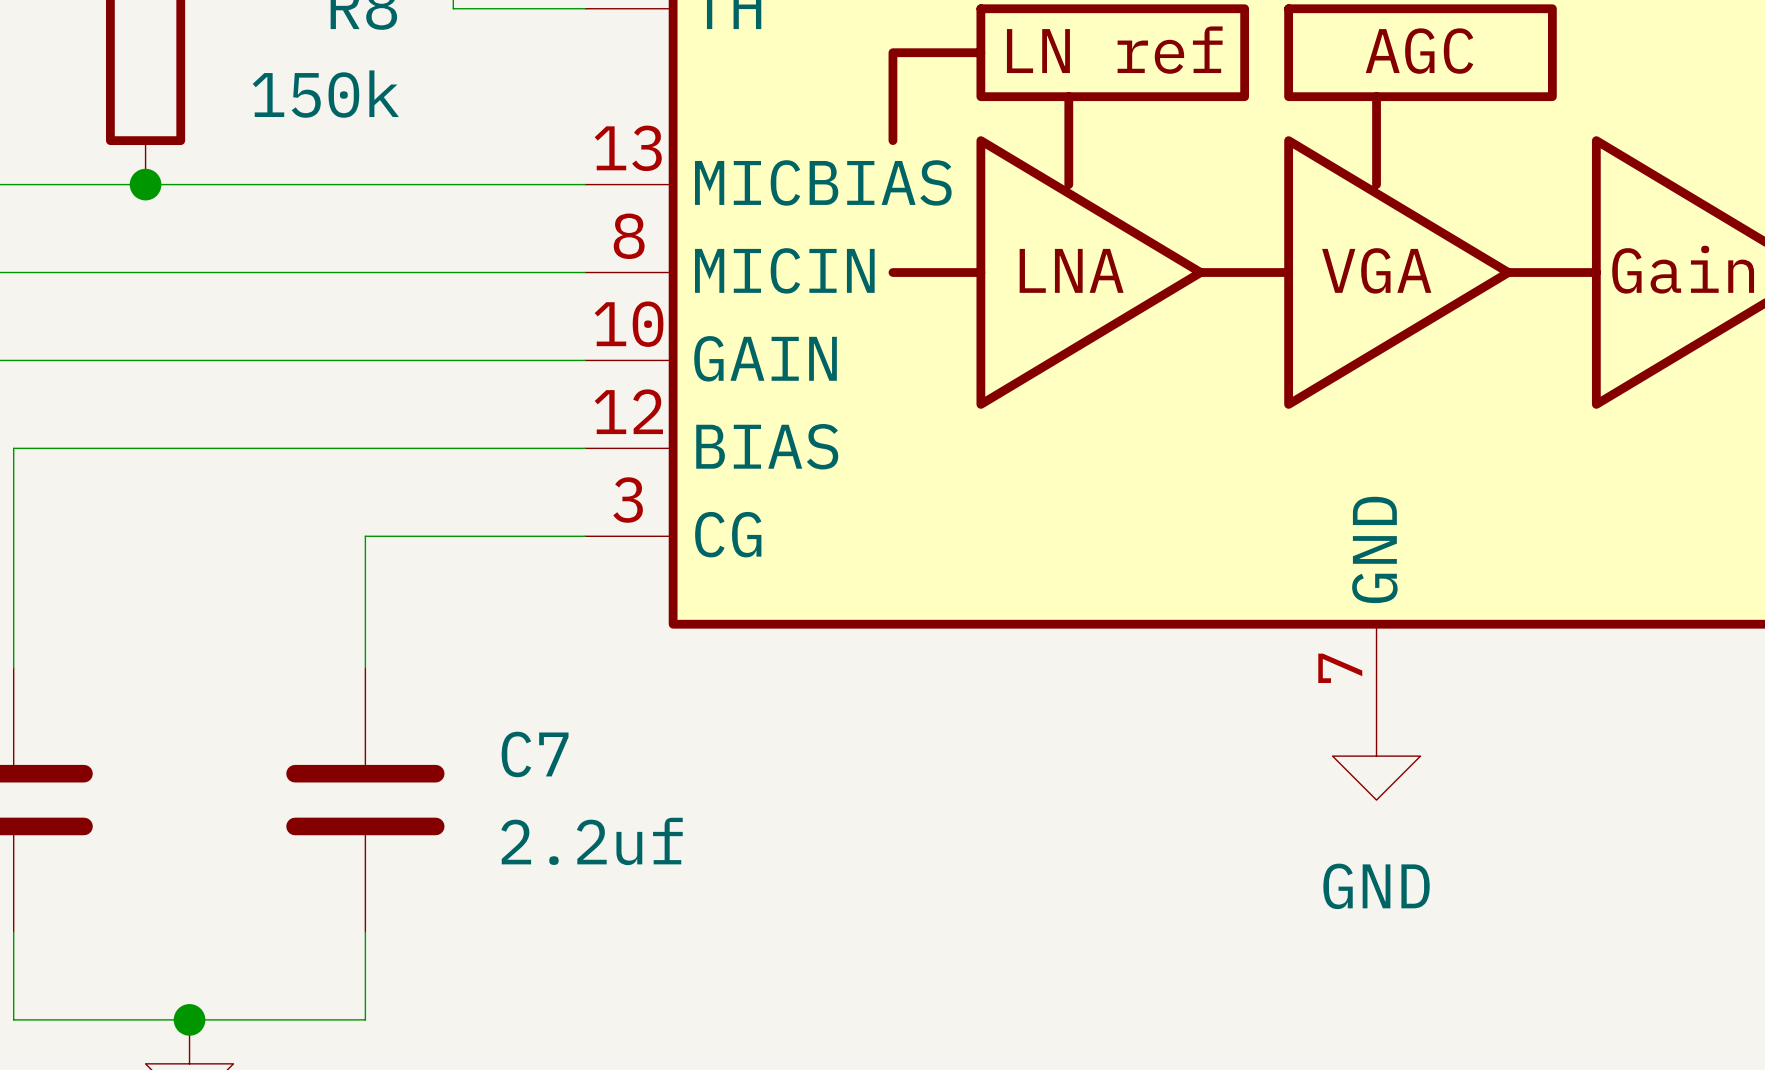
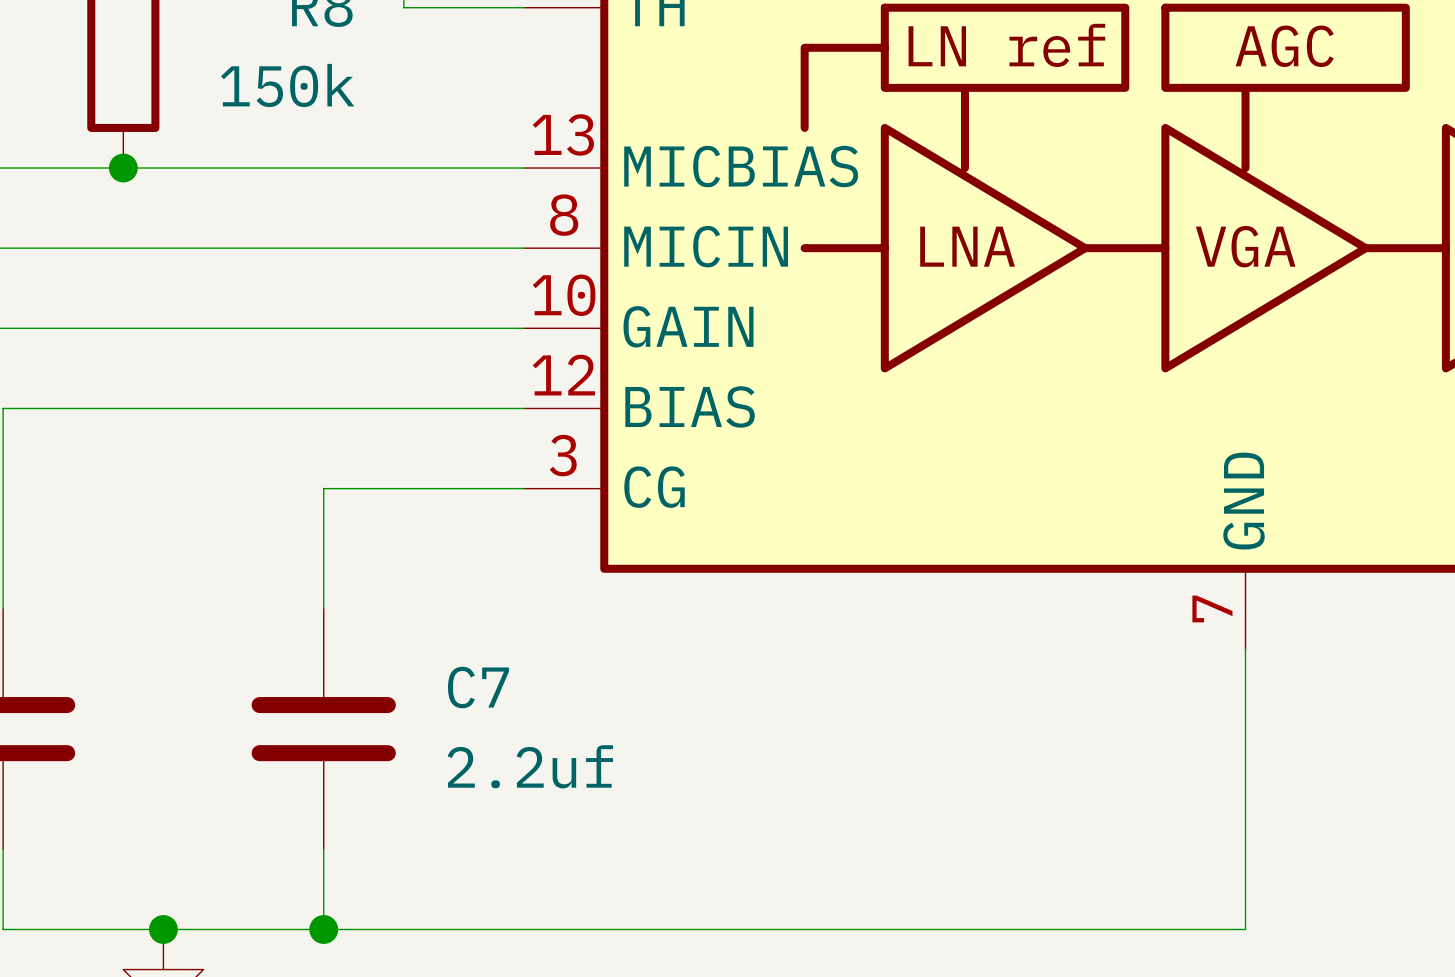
wire: none -> (1245, 648) (1245, 929) (323, 929)
power symbol: GND (1376, 756) -> none
junction: none -> (323, 929)

